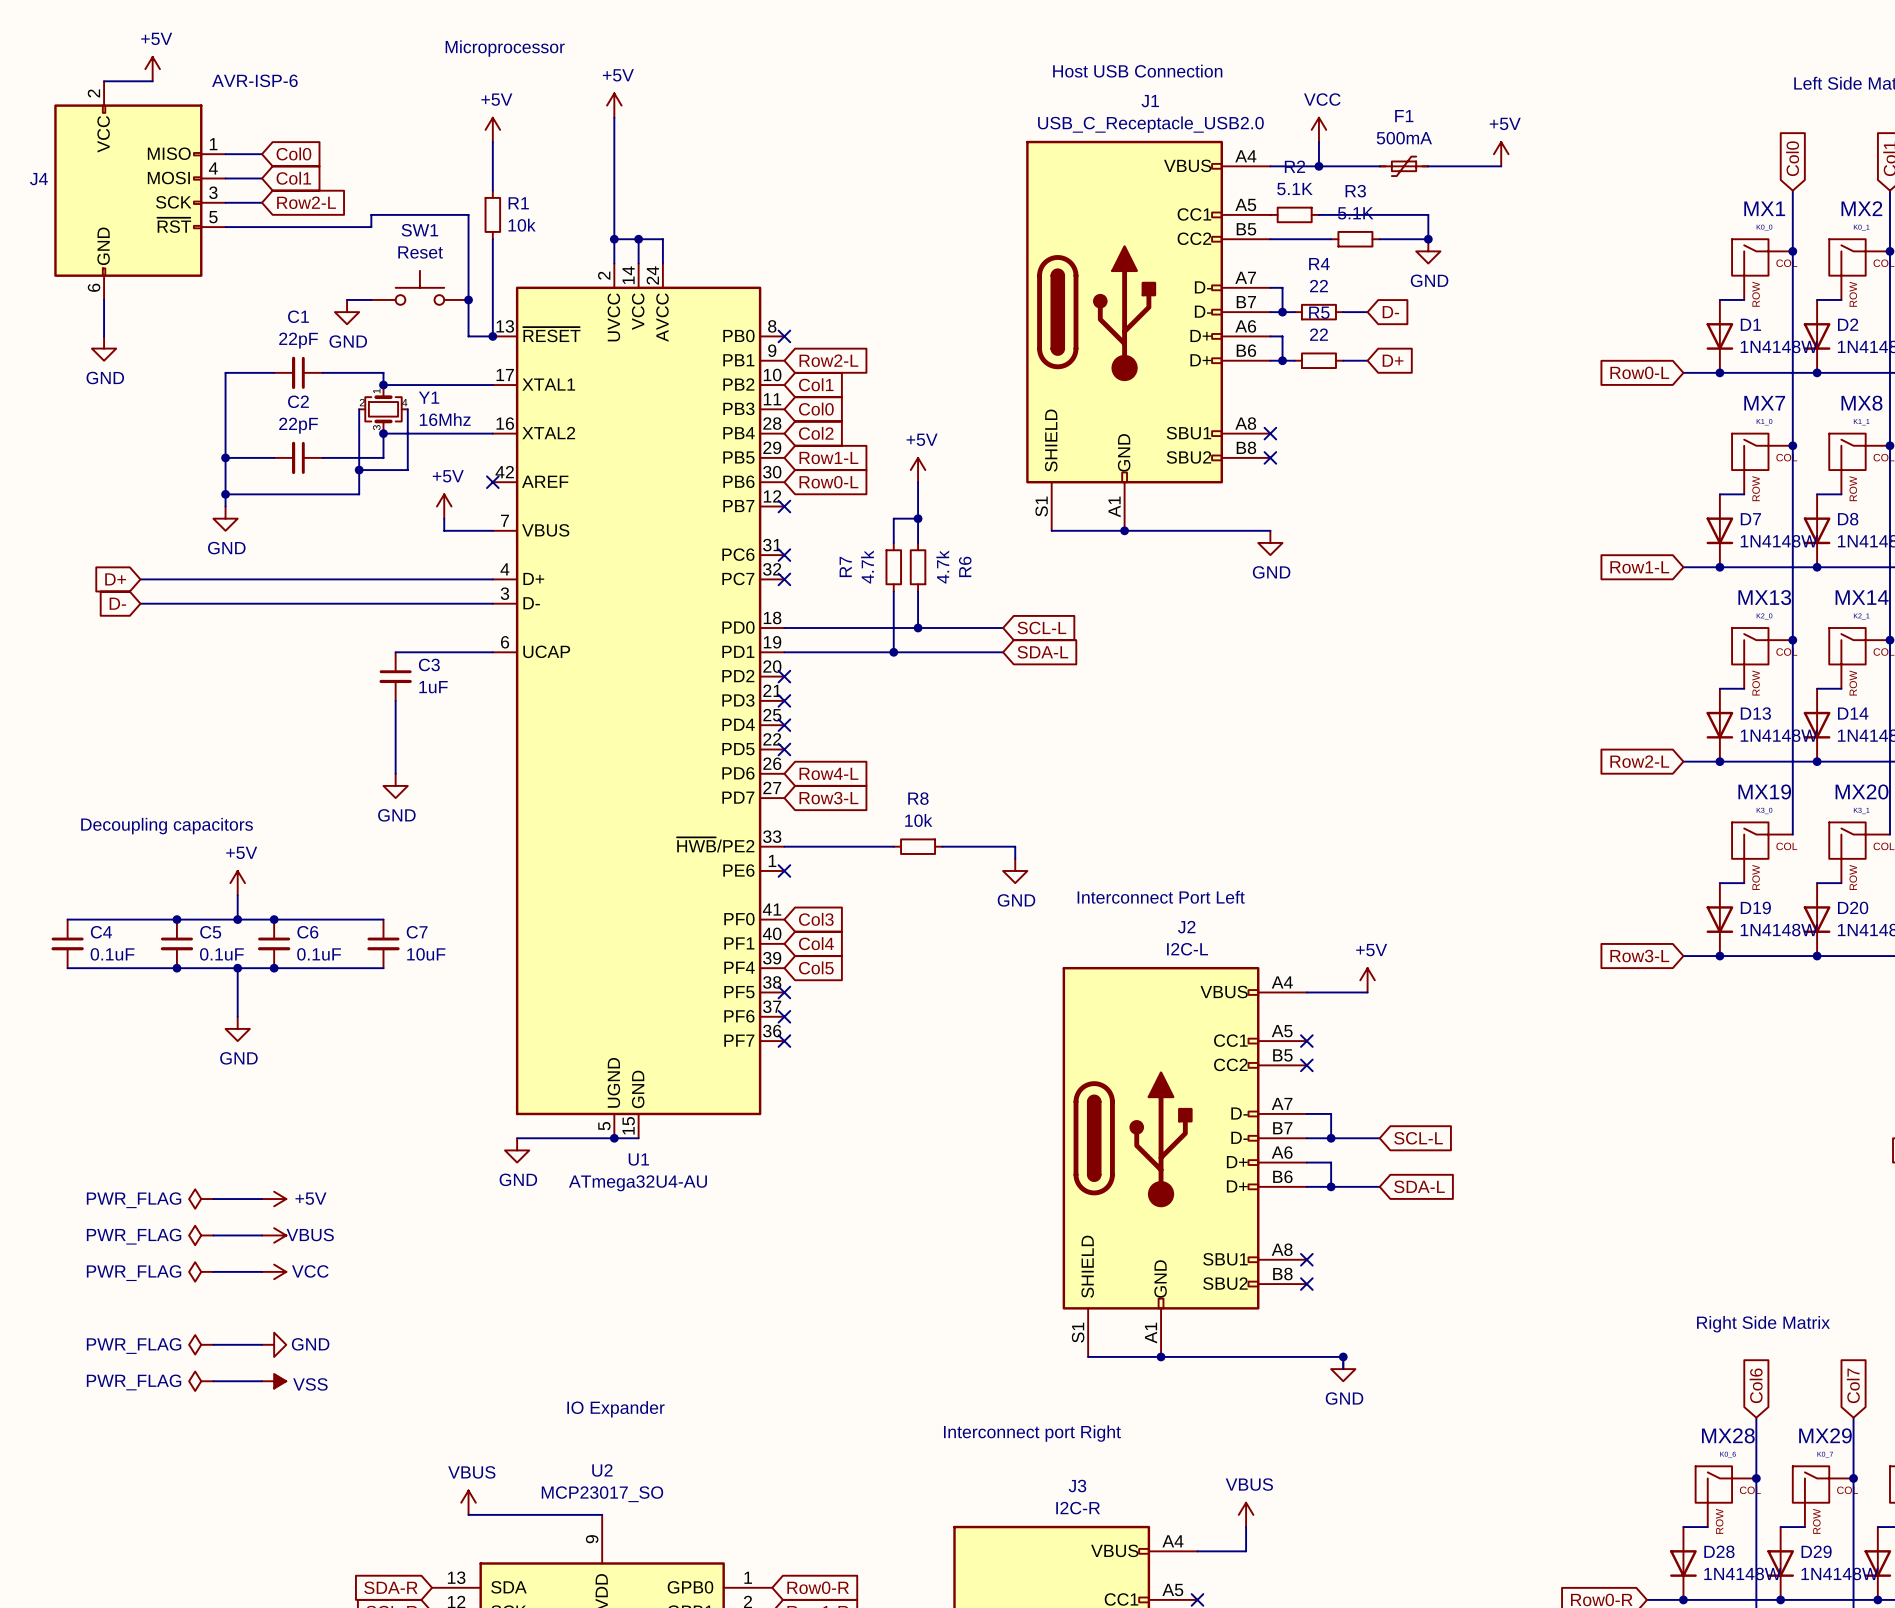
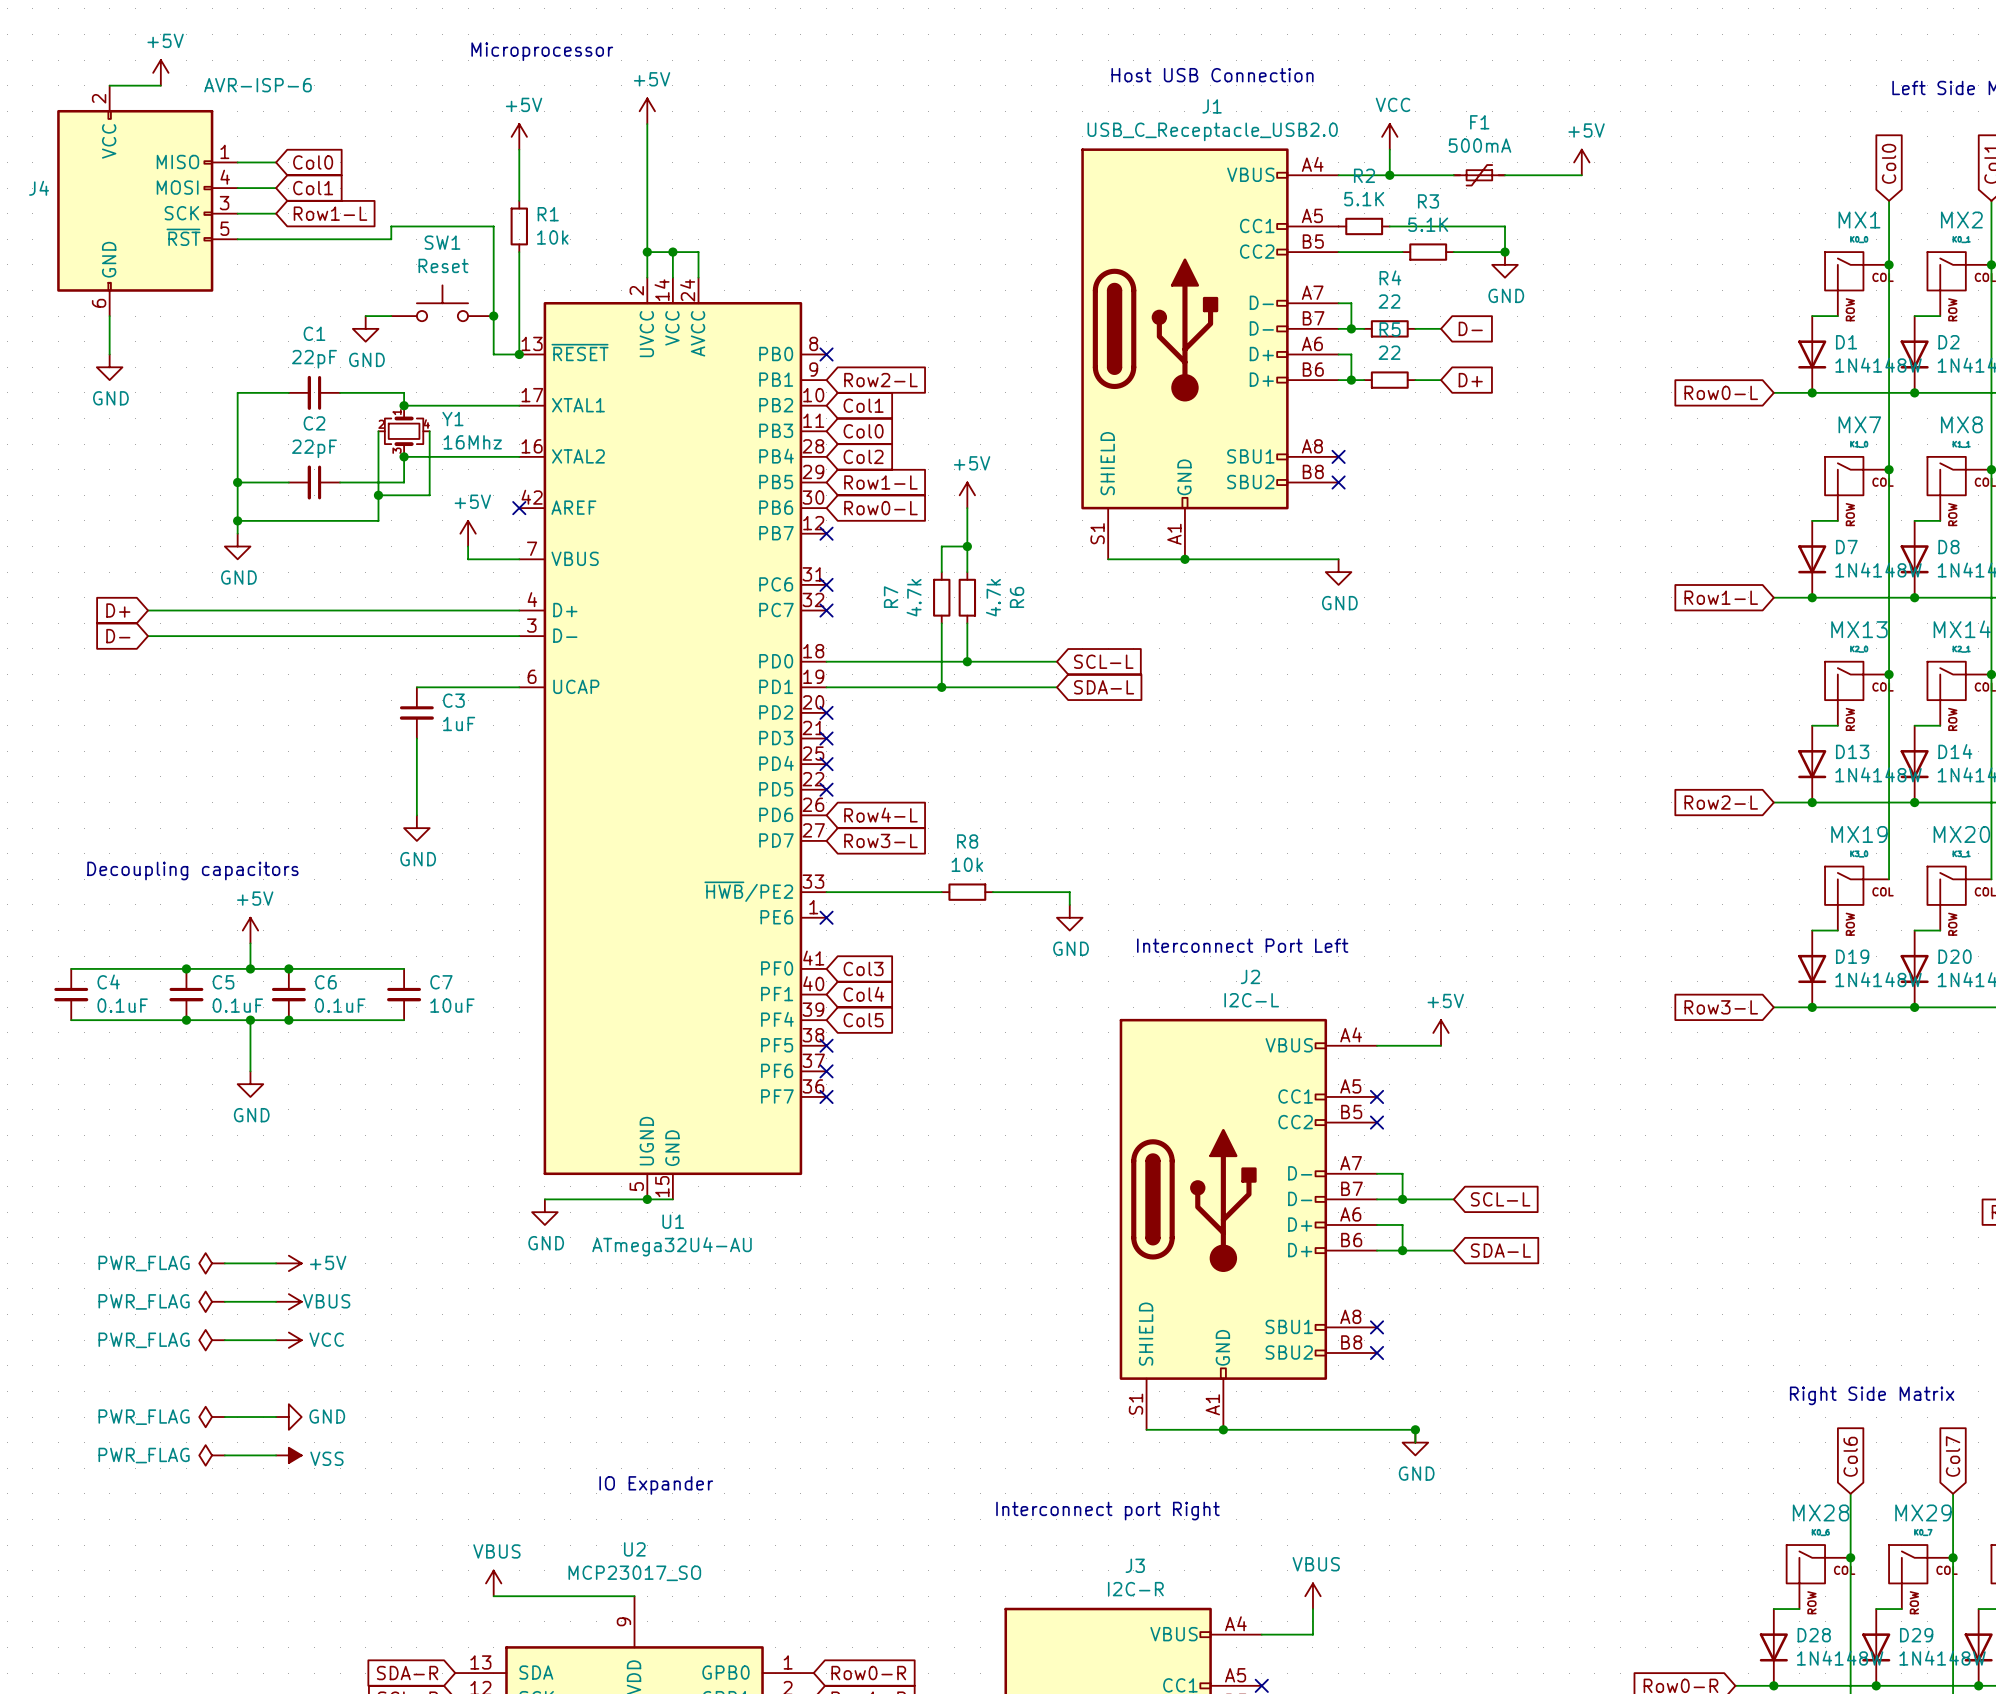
global label: Row2-L (306, 202) -> Row1-L (330, 213)

